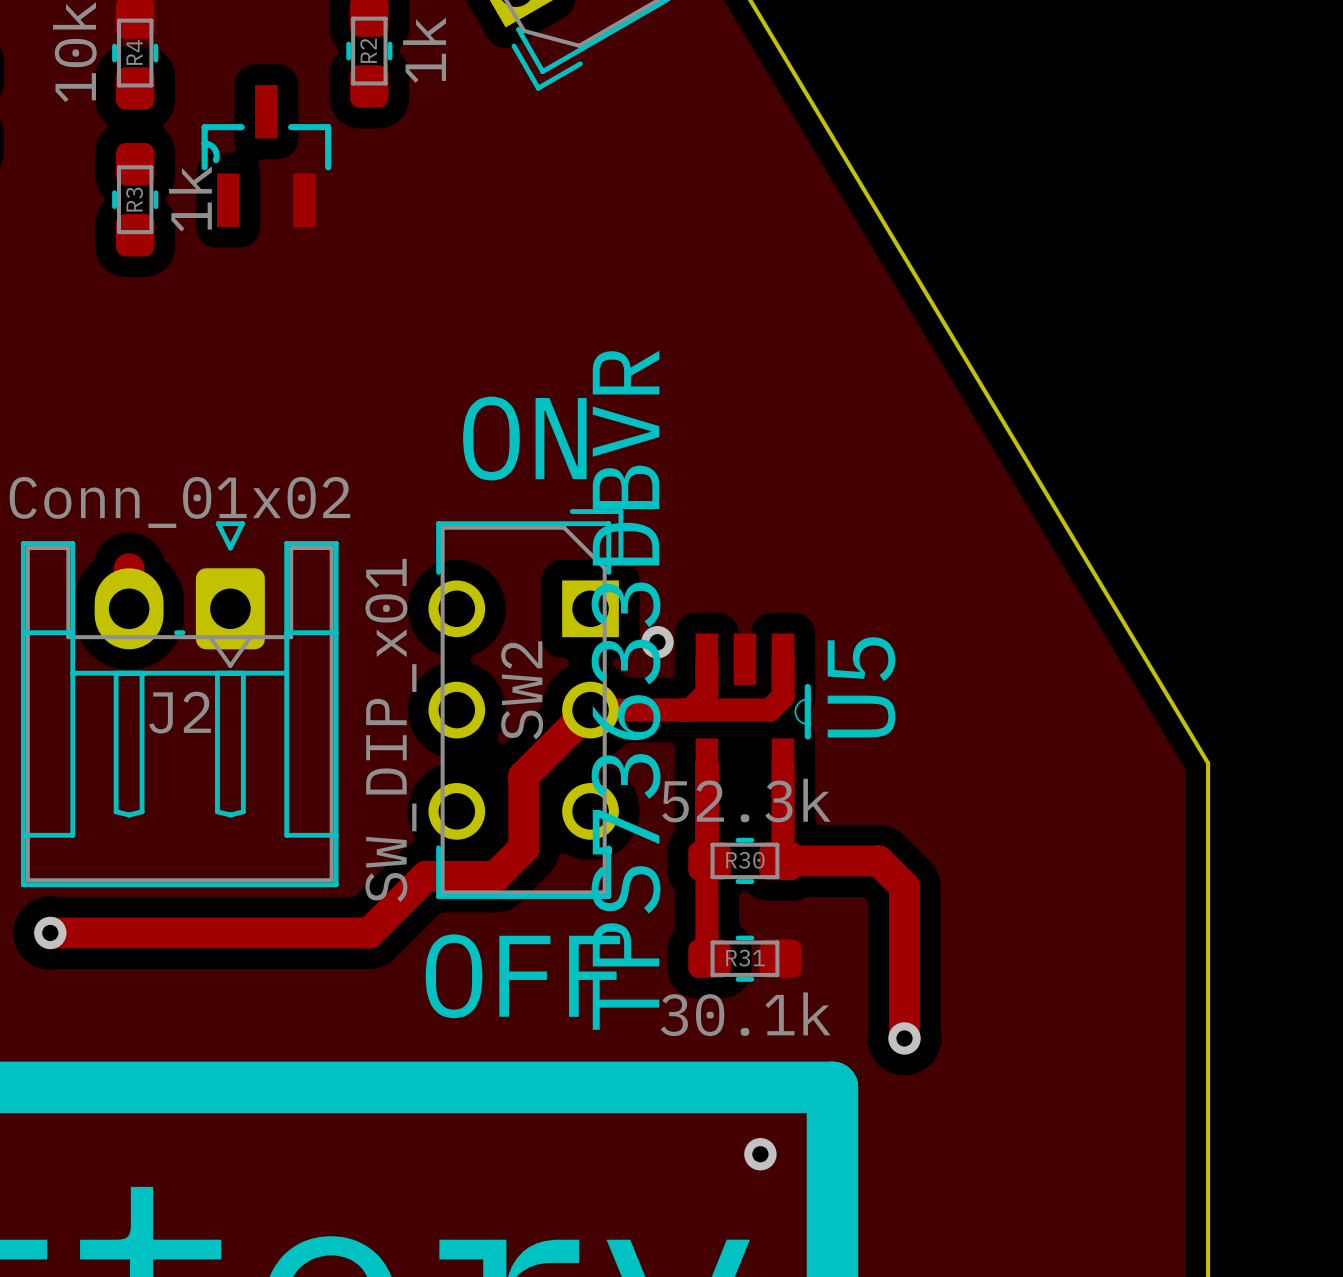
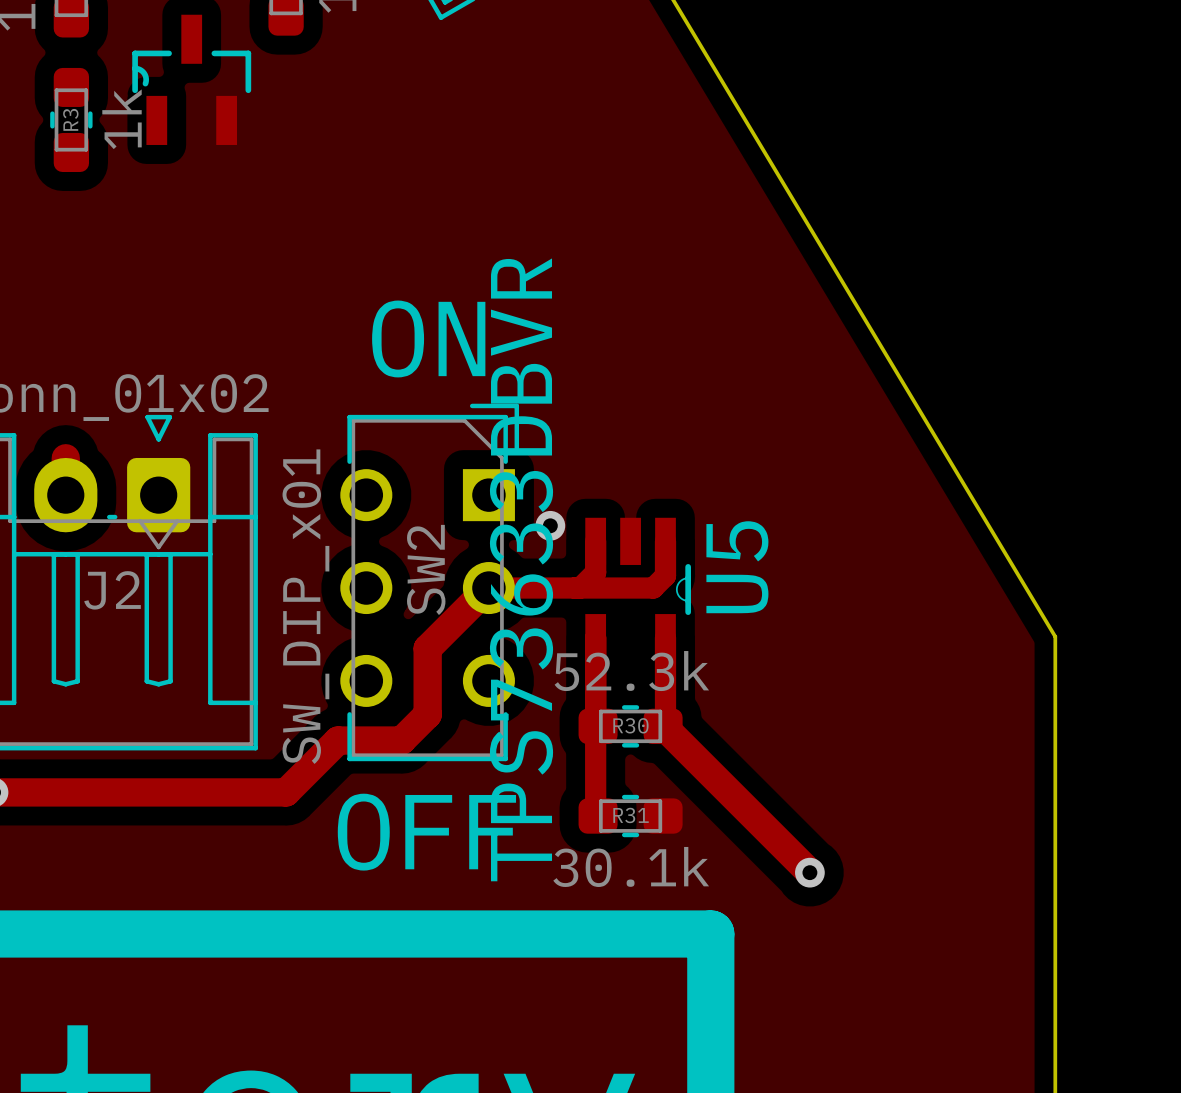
track: (781, 860) (878, 860) (904, 886) (904, 1038) -> (663, 726) (809, 872)
via position: (904, 1038) -> (809, 872)
via: (760, 1154) -> none

